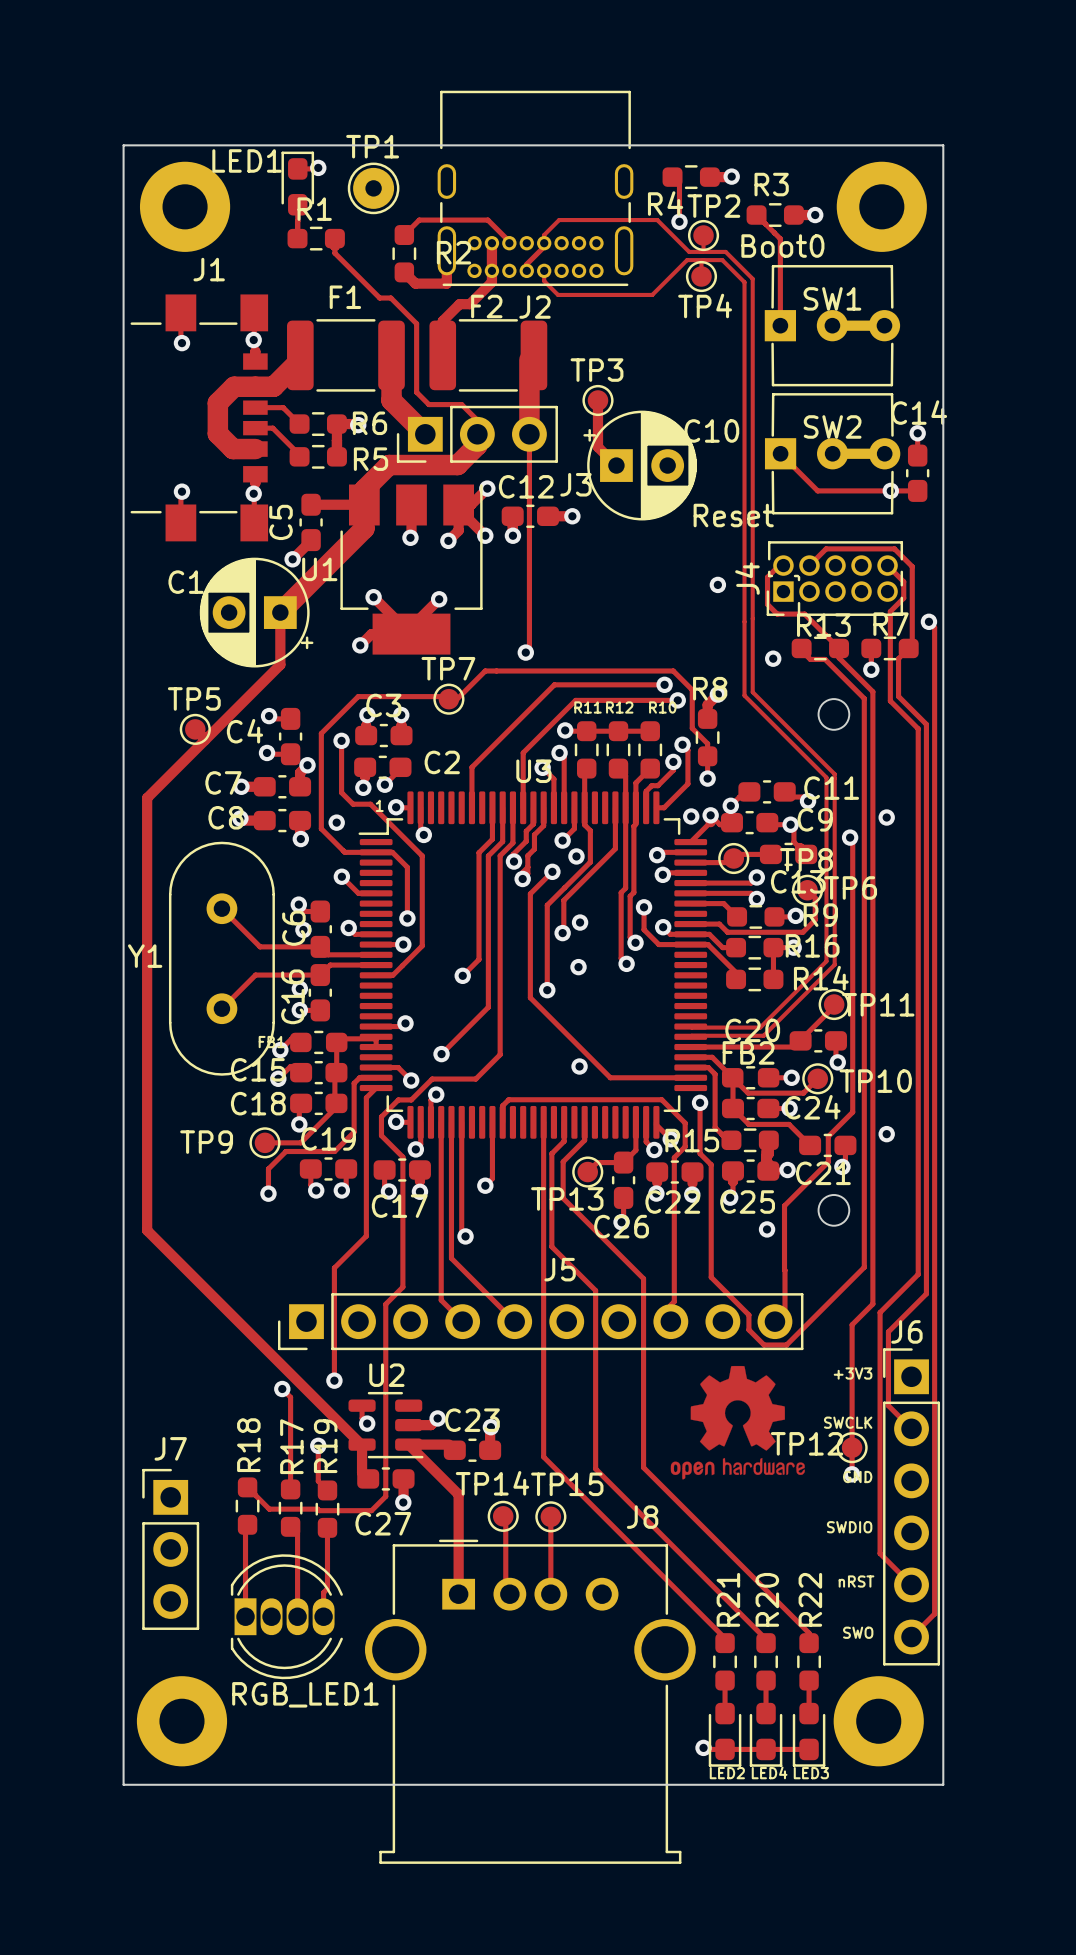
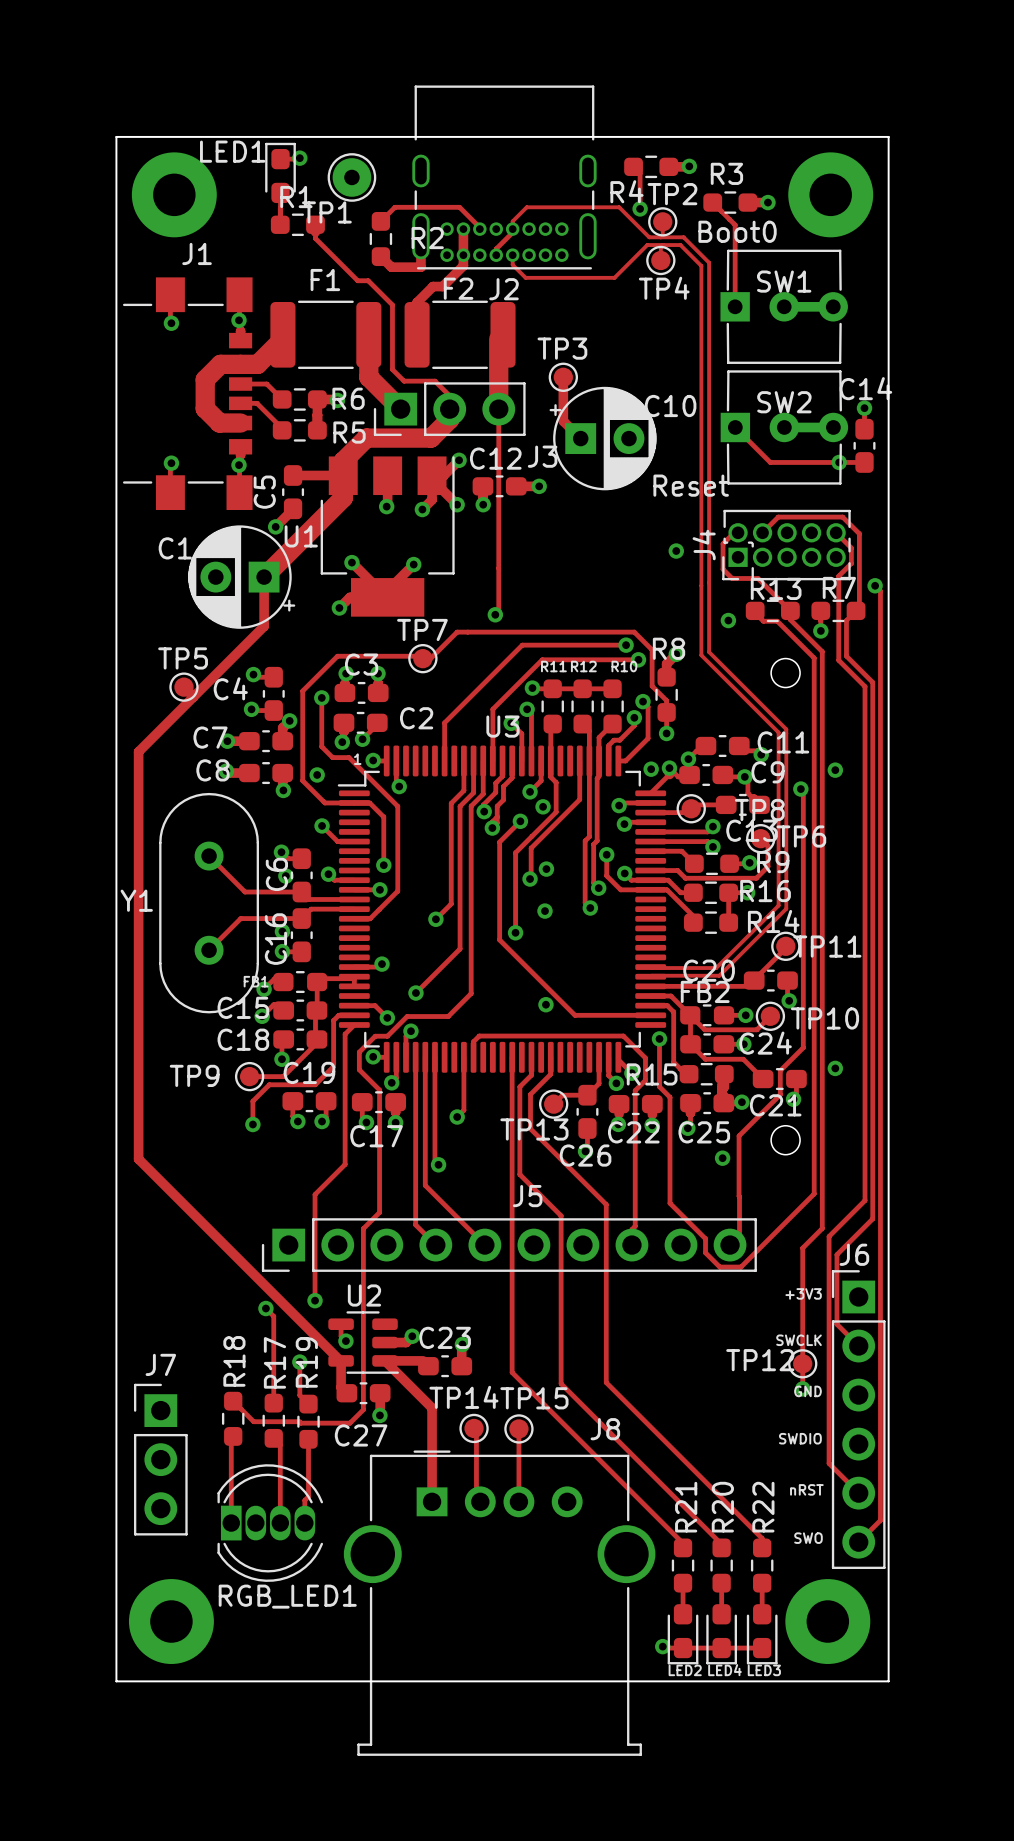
TP1 name position: TP1 (372, 146) -> TP1 (326, 212)
drawing: [670, 1365, 805, 1480] -> none

